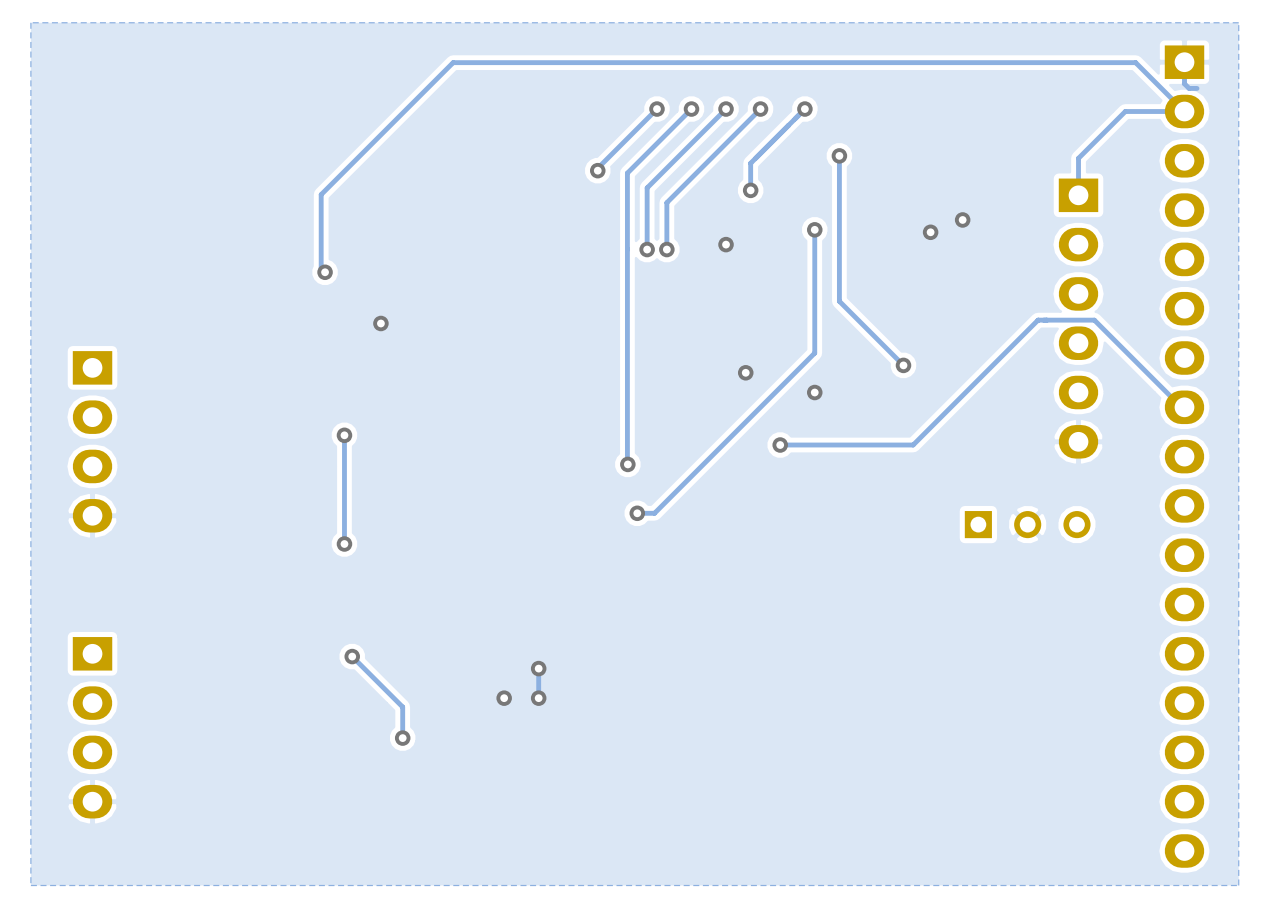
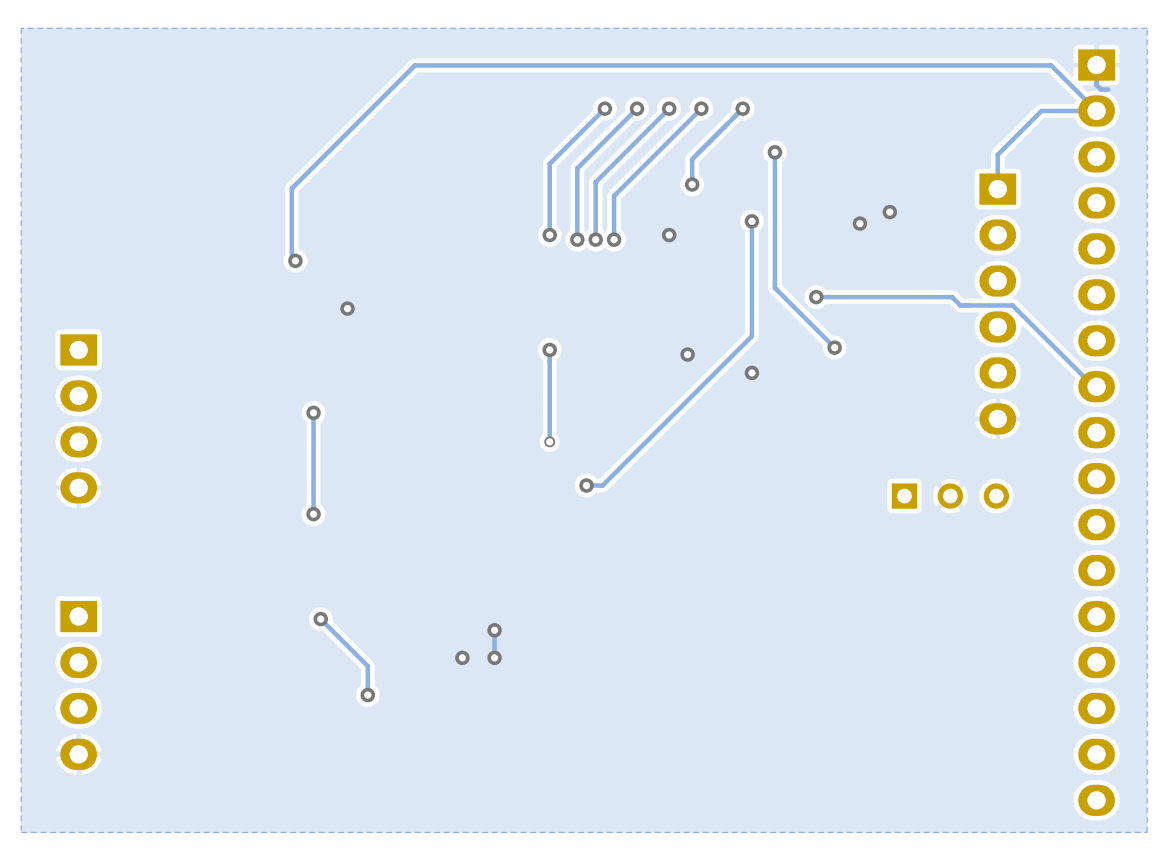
via: (597, 170) -> none
via: none -> (549, 235)
track: (627, 249) (627, 464) -> none
via: none -> (577, 239)
via: none -> (816, 297)
track: (1038, 320) (913, 445) (780, 445) -> (960, 305) (952, 297) (816, 297)
track: none -> (549, 349) (549, 441)
via: none -> (549, 349)
via: (780, 445) -> none
via: (627, 464) -> none
via: none -> (549, 441)

